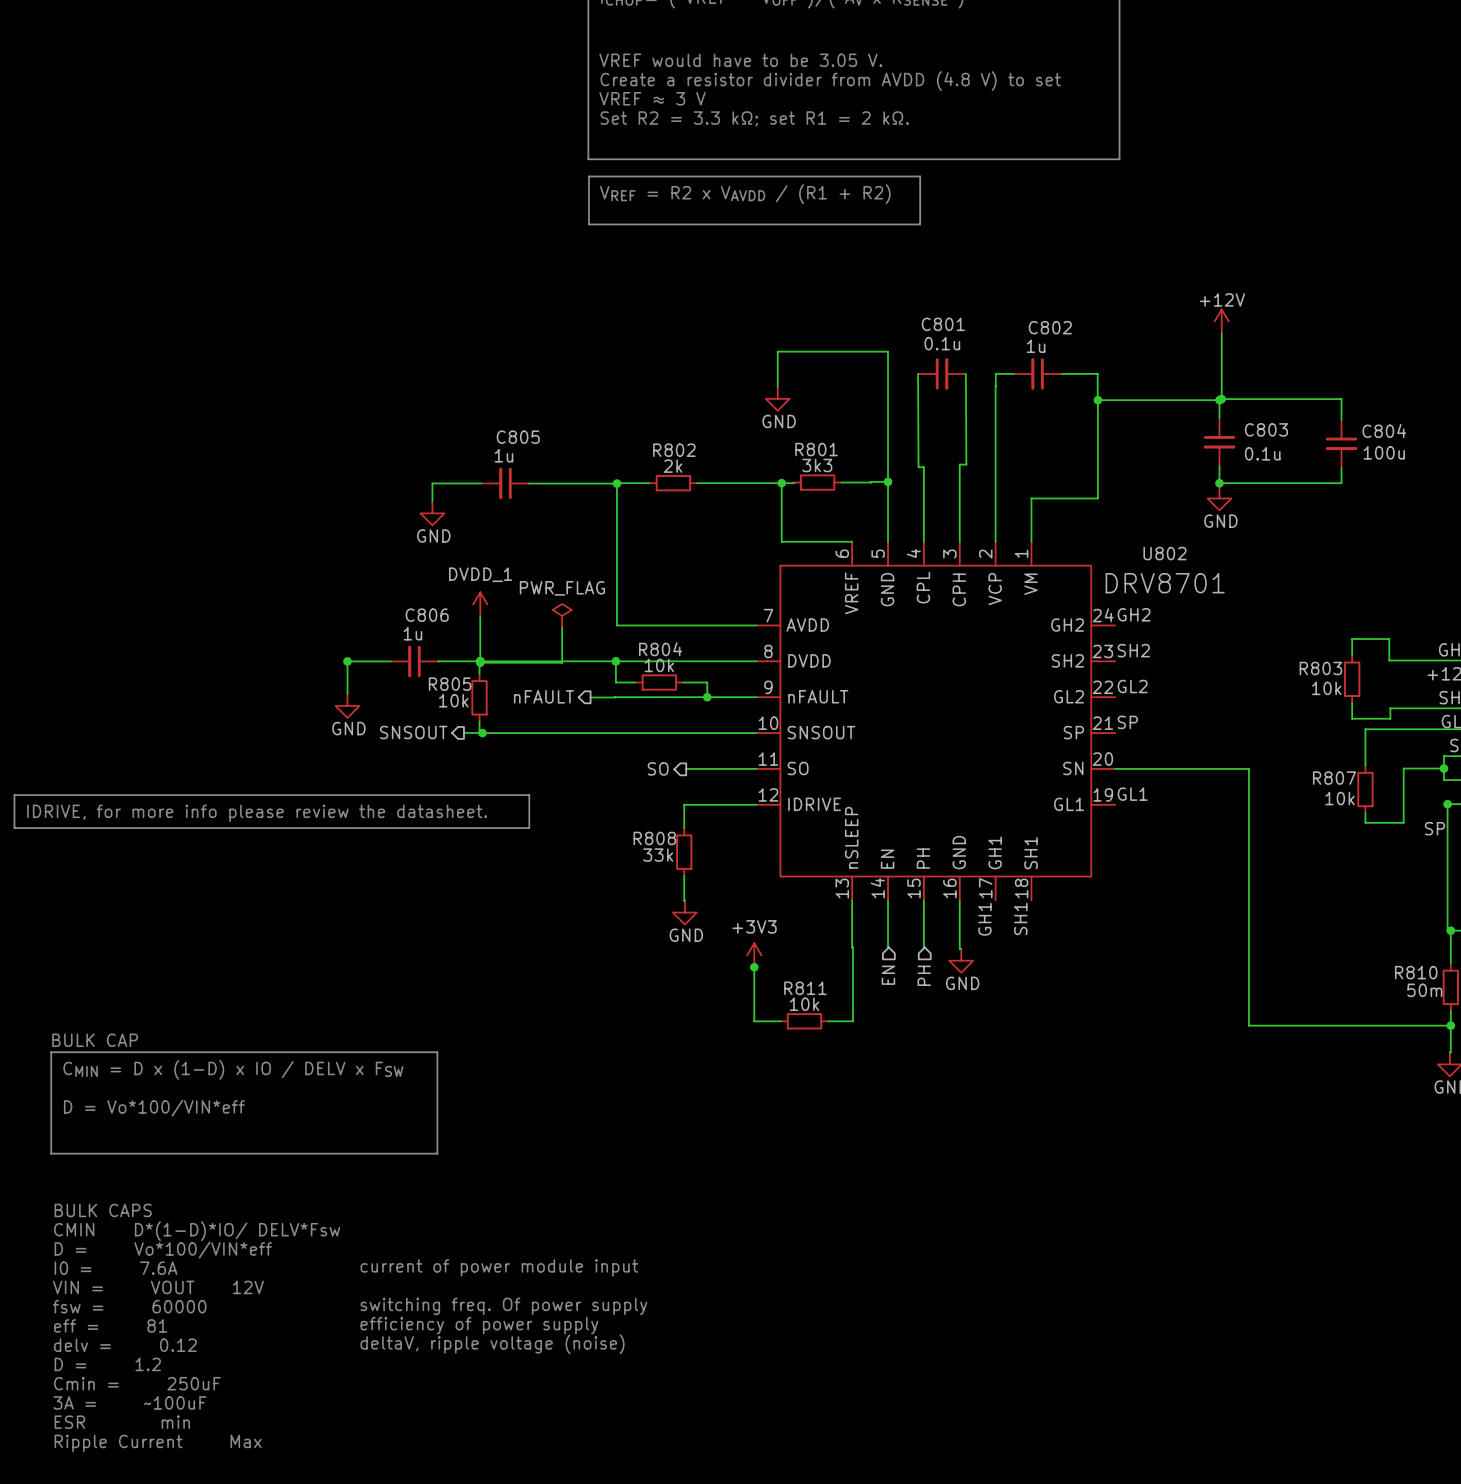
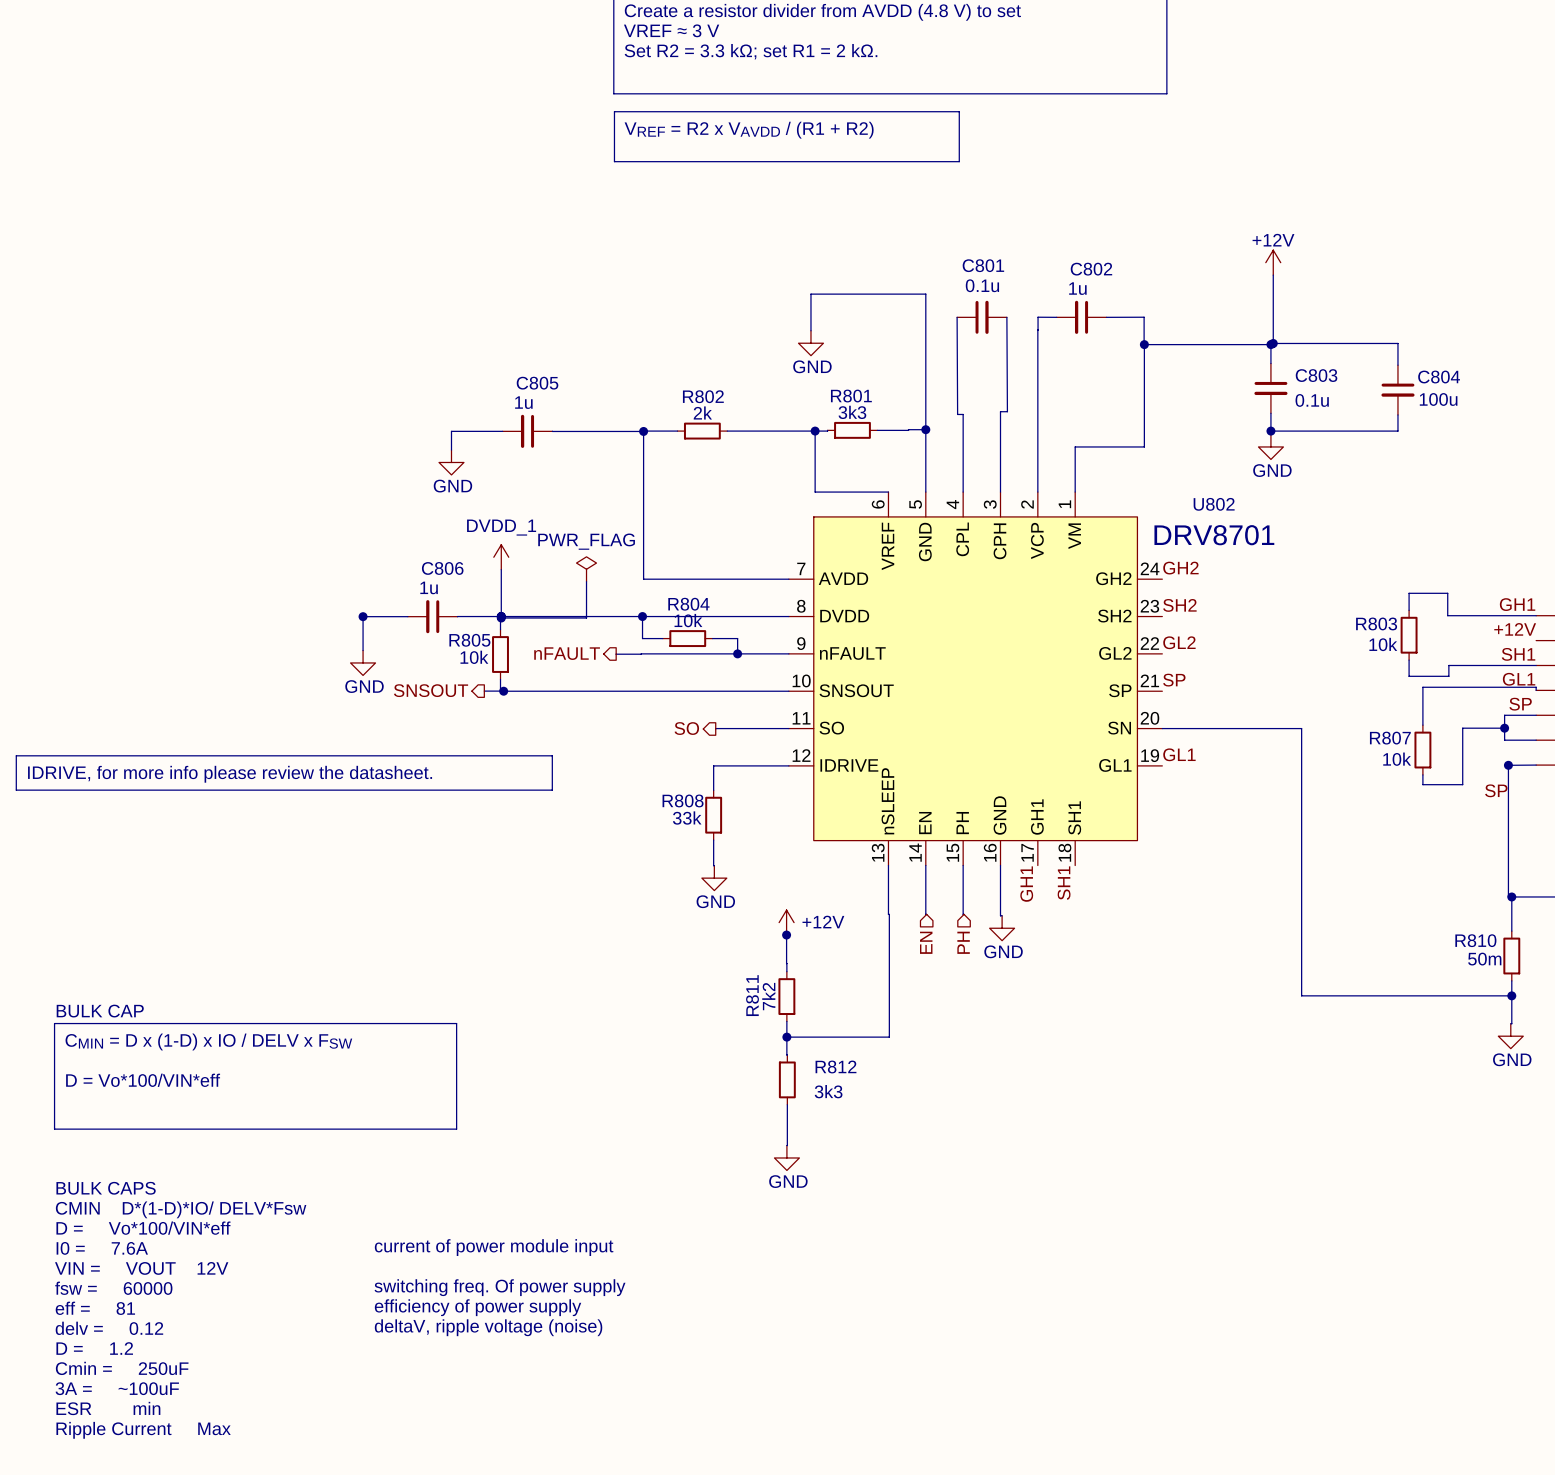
power symbol: +3V3 (754, 955) -> +12V (786, 922)
R811 name position: R811 (805, 988) -> R811 (752, 995)
wire: (754, 994) (754, 1021) (780, 1021) -> (786, 963) (786, 971)
R811 value: 10k (804, 1004) -> 7k2 (768, 996)
R811 rotation: 0° (804, 1021) -> 90° clockwise (786, 996)
R811 position: (804, 1021) -> (786, 996)
wire: (828, 1021) (852, 1021) -> (786, 1037) (889, 1037) (889, 991)
wire: none -> (786, 1021) (787, 1055)
junction: none -> (786, 1037)
R812: none -> 3k3 (787, 1079)
wire: none -> (787, 1104) (786, 1145)
power symbol: none -> GND (786, 1157)

